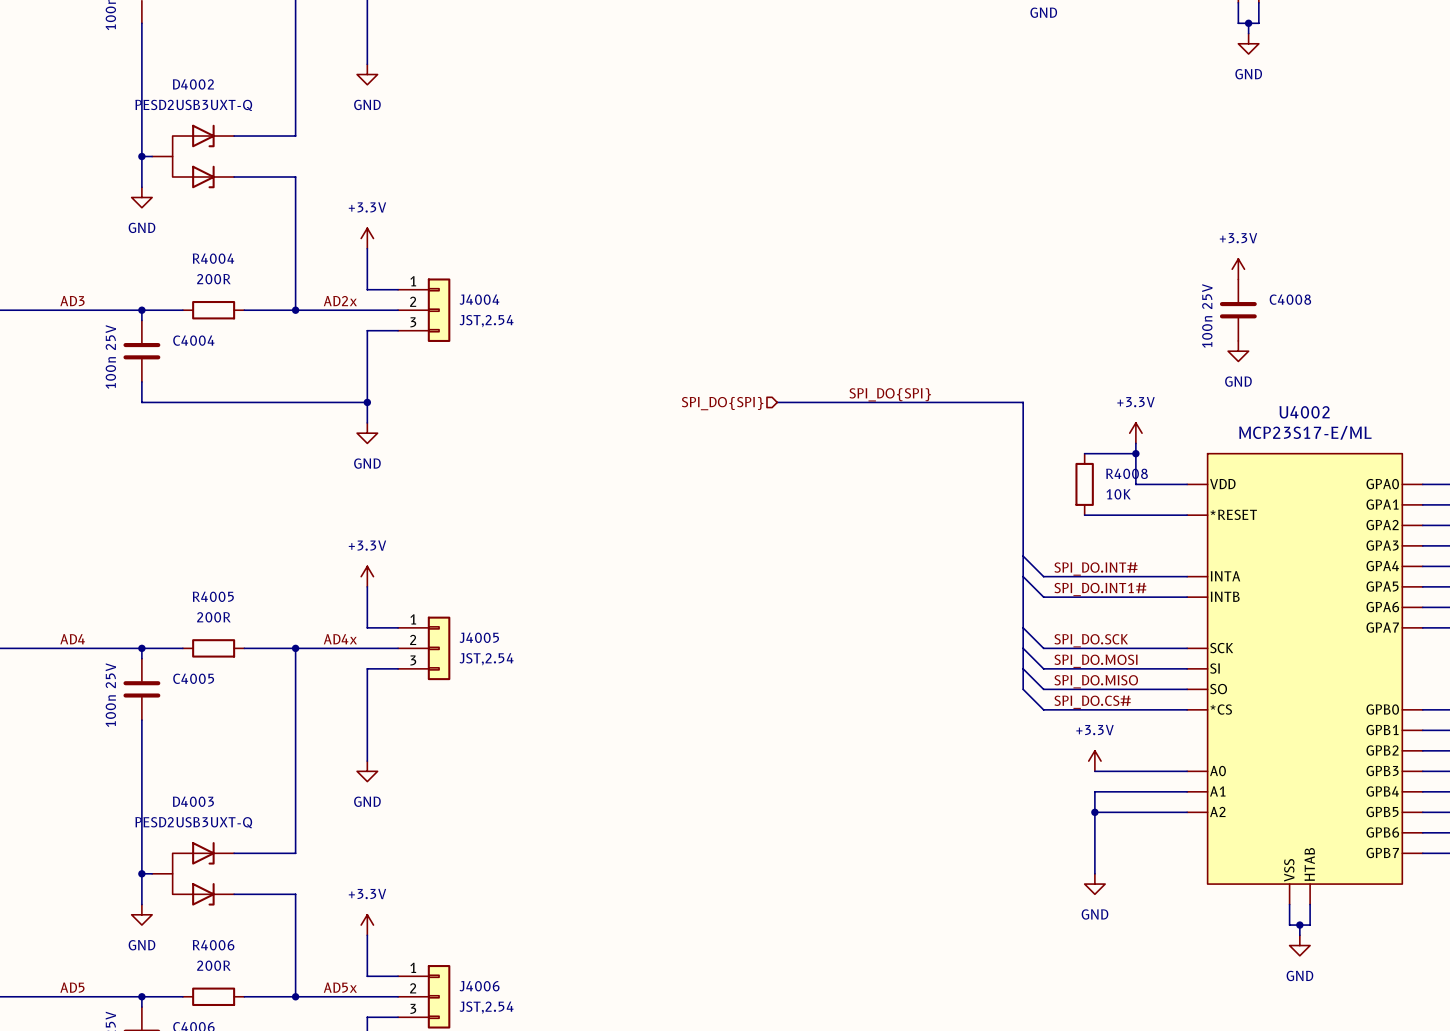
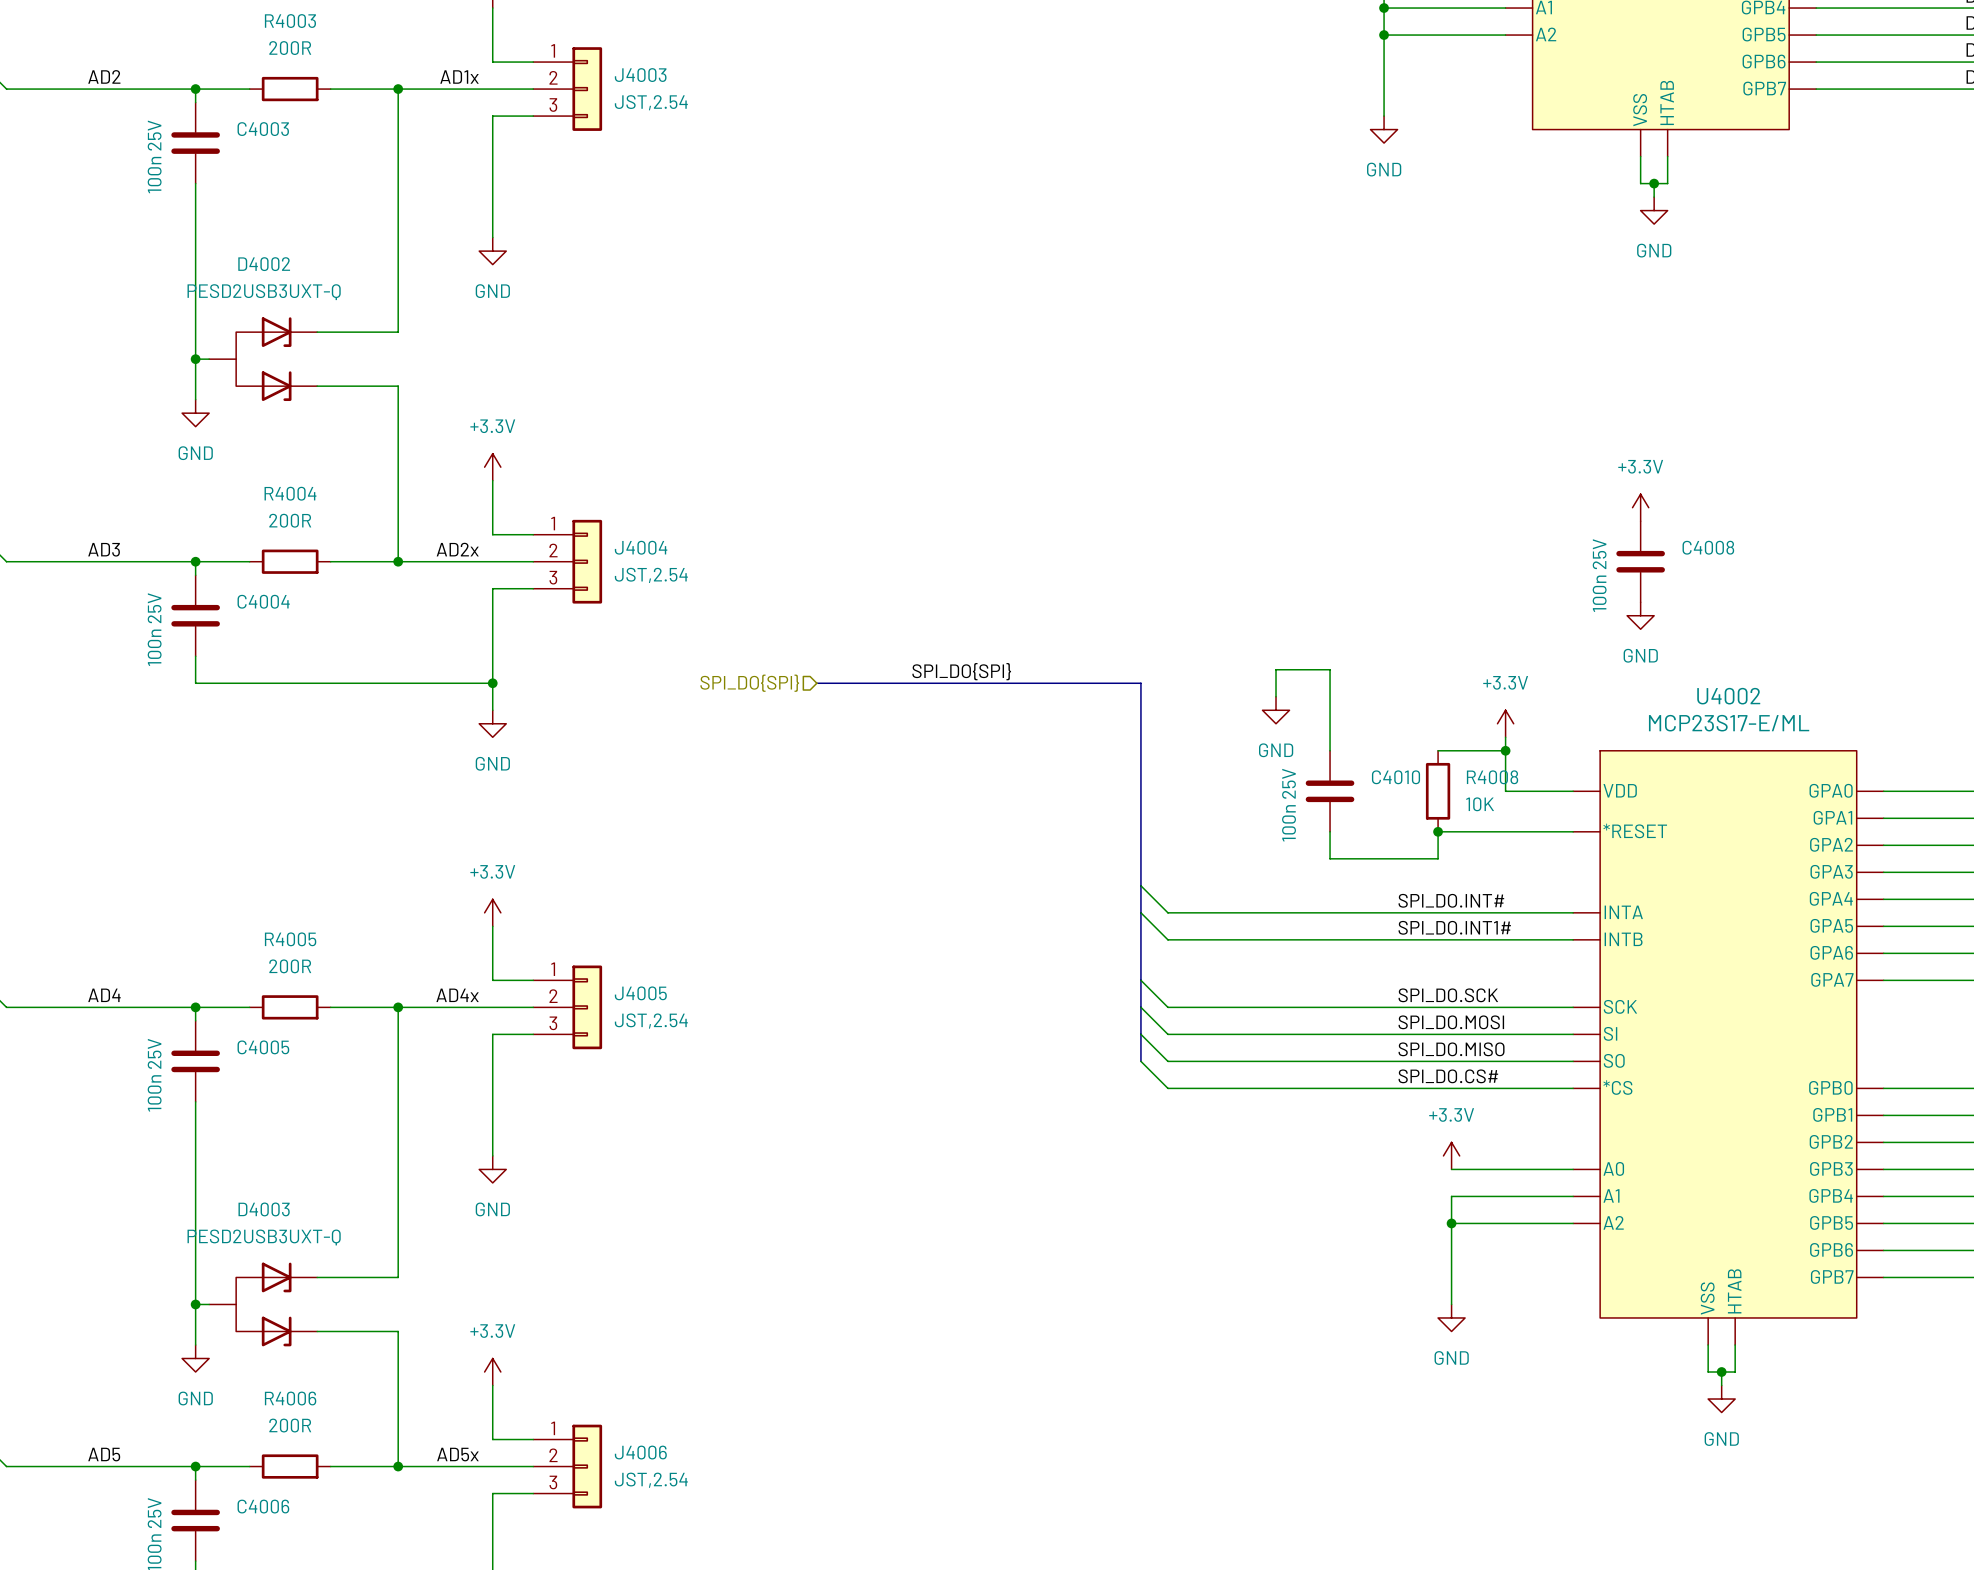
label position: SPI_DO{SPI} (890, 394) -> SPI_DO{SPI} (961, 671)
bus: none -> (816, 683) (1032, 683)
bus: (859, 402) (1023, 402) (1023, 689) -> (1140, 683) (1140, 1061)
hierarchical label position: SPI_DO{SPI} (722, 403) -> SPI_DO{SPI} (749, 683)
wire: none -> (1276, 696) (1276, 669) (1330, 669) (1330, 750)
power symbol: none -> GND (1276, 710)
C4010: none -> 100n 25V (1330, 791)
wire: none -> (1330, 831) (1330, 858) (1438, 858) (1438, 831)
junction: none -> (1438, 831)
wire: (1023, 556) (1043, 576) -> (1140, 885) (1167, 912) (1384, 912)
wire: (1023, 576) (1043, 597) -> (1140, 912) (1167, 939) (1384, 939)
wire: (1023, 627) (1043, 648) -> (1140, 980) (1167, 1007) (1384, 1007)
wire: (1023, 648) (1043, 668) -> (1140, 1007) (1167, 1034) (1384, 1034)
wire: (1023, 668) (1043, 689) -> (1140, 1034) (1167, 1061) (1384, 1061)
wire: (1023, 689) (1043, 709) -> (1140, 1061) (1167, 1088) (1384, 1088)

